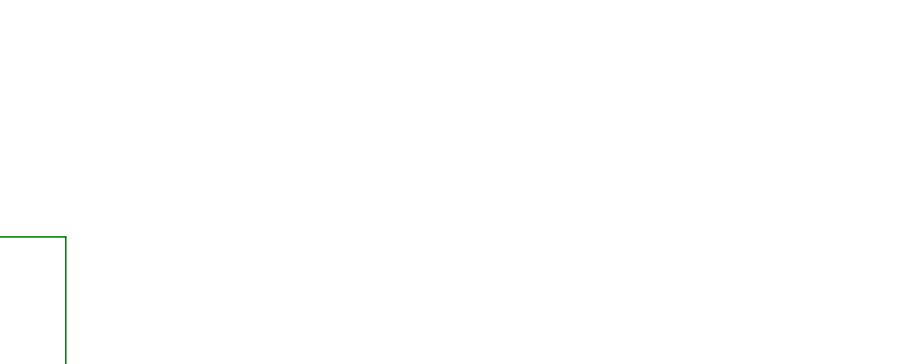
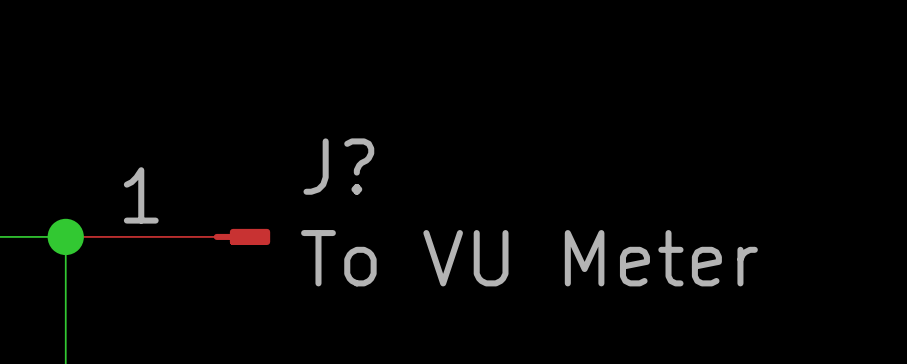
junction: none -> (65, 236)
J?: none -> To VU Meter (167, 236)

